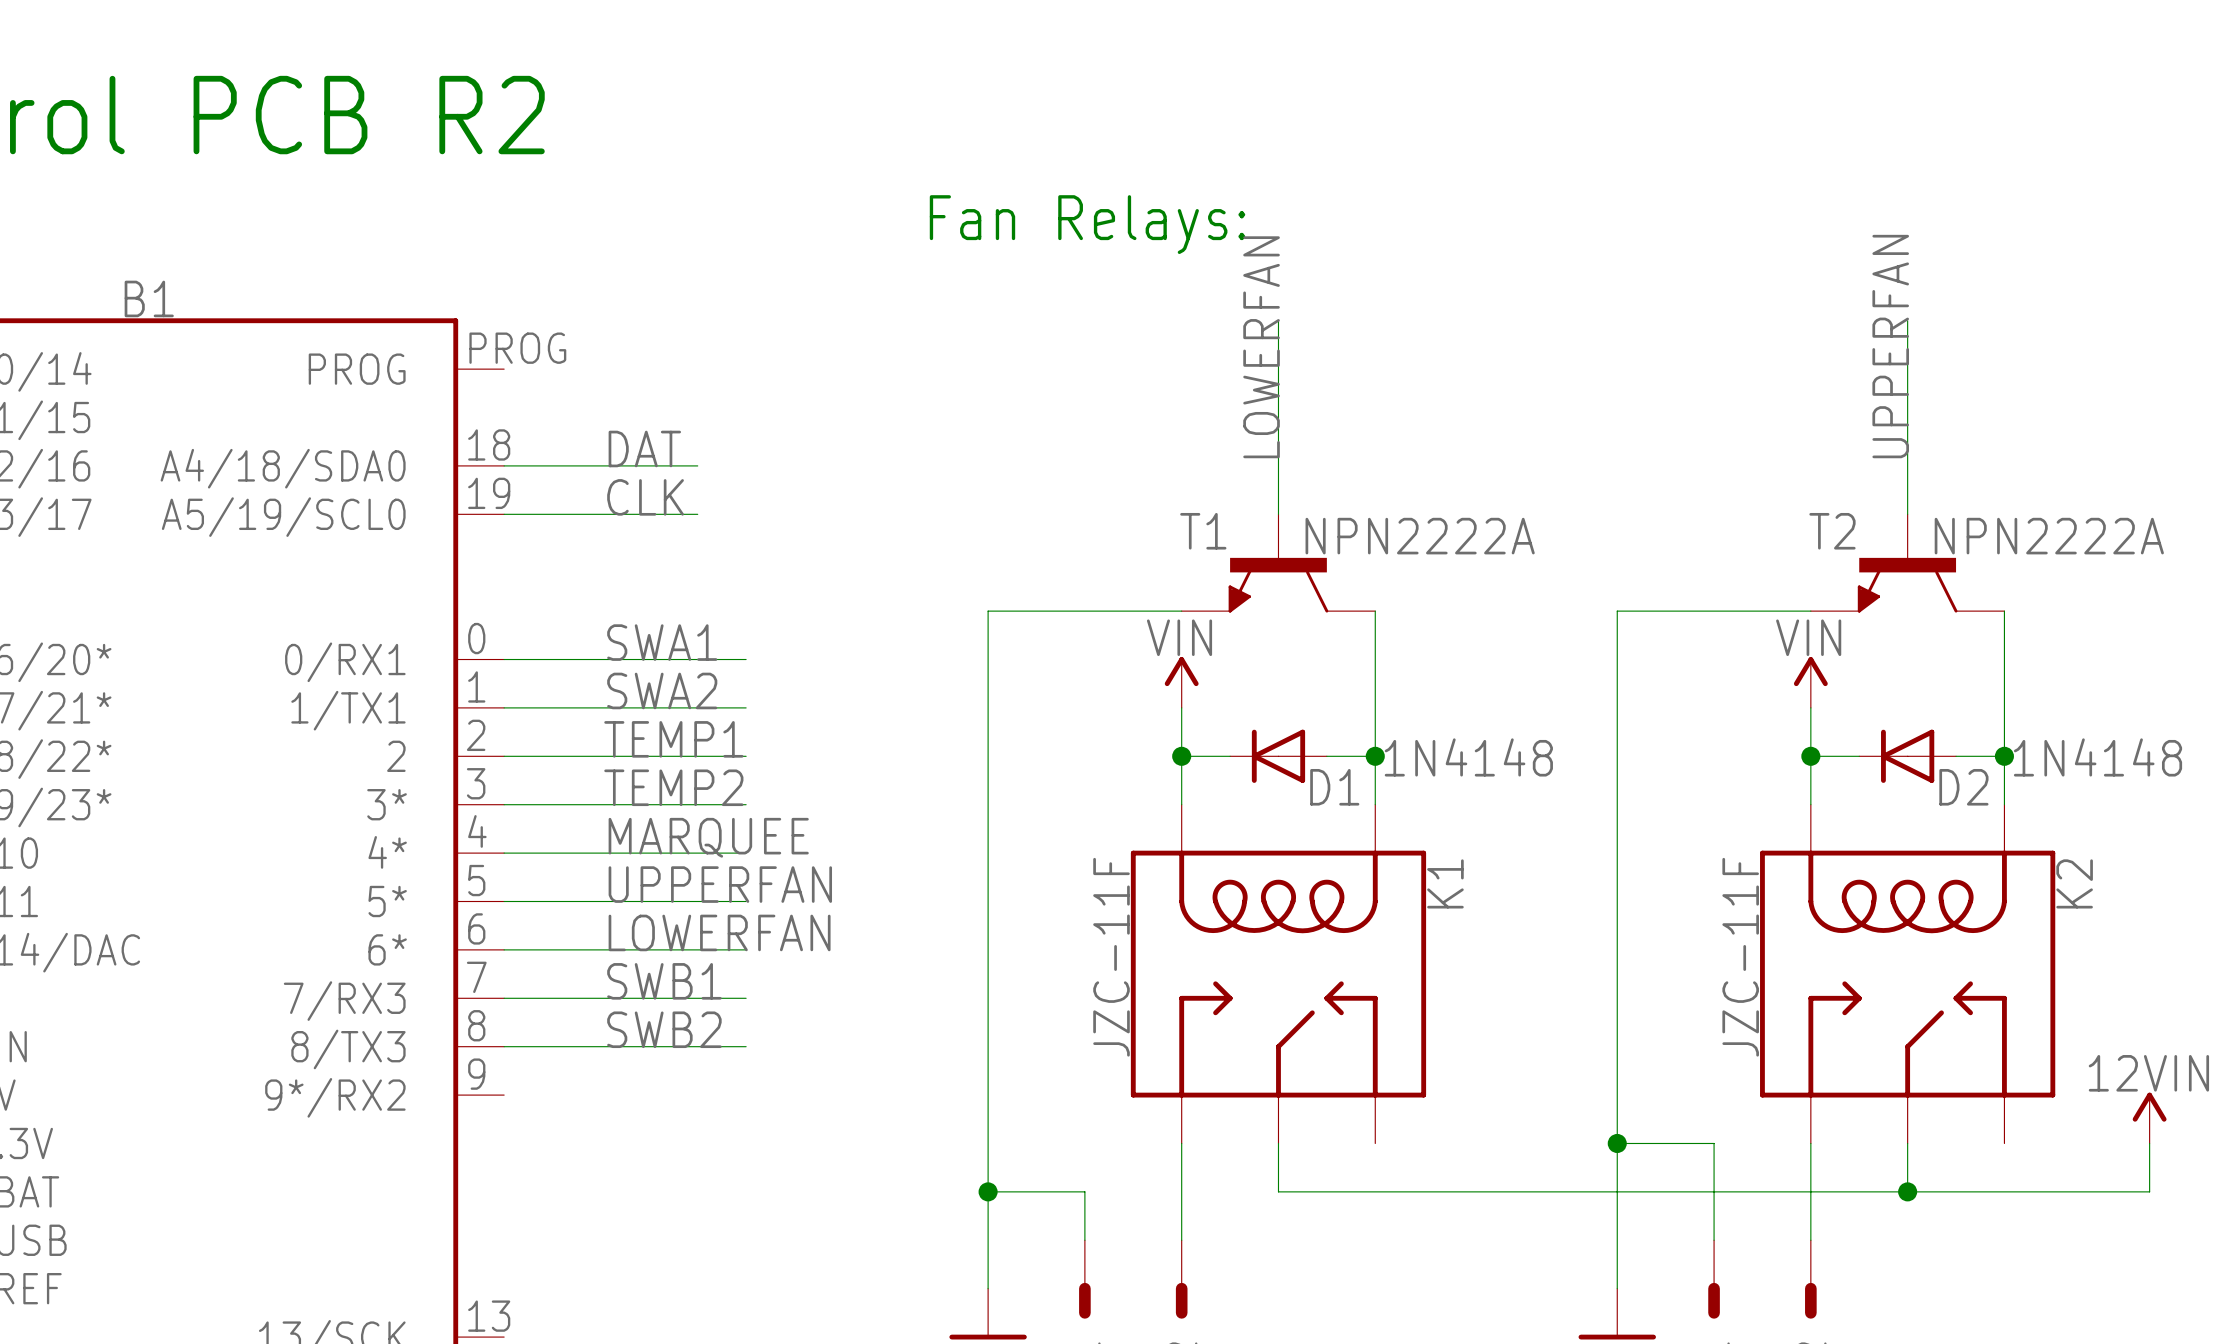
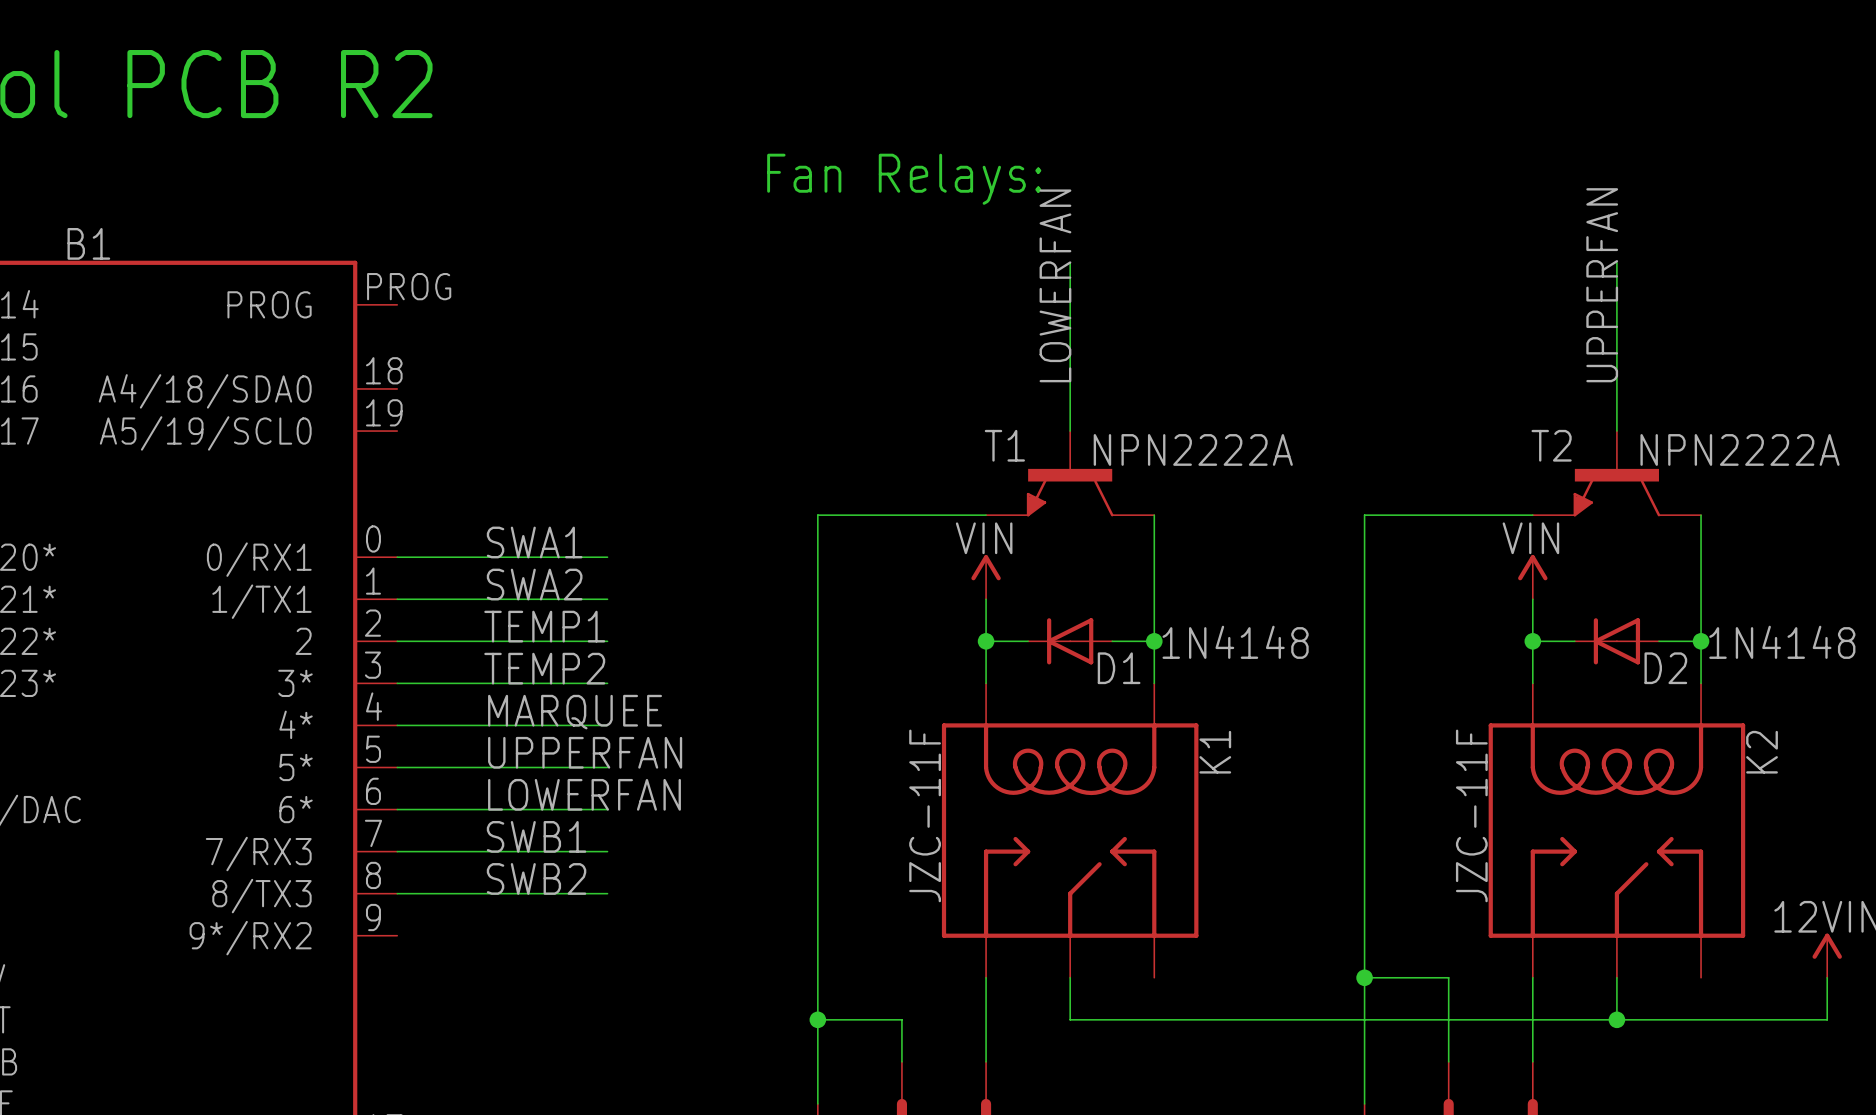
label: DAT (644, 448) -> none
wire: (504, 465) (697, 465) -> none
label: CLK (645, 497) -> none
wire: (504, 514) (697, 514) -> none

